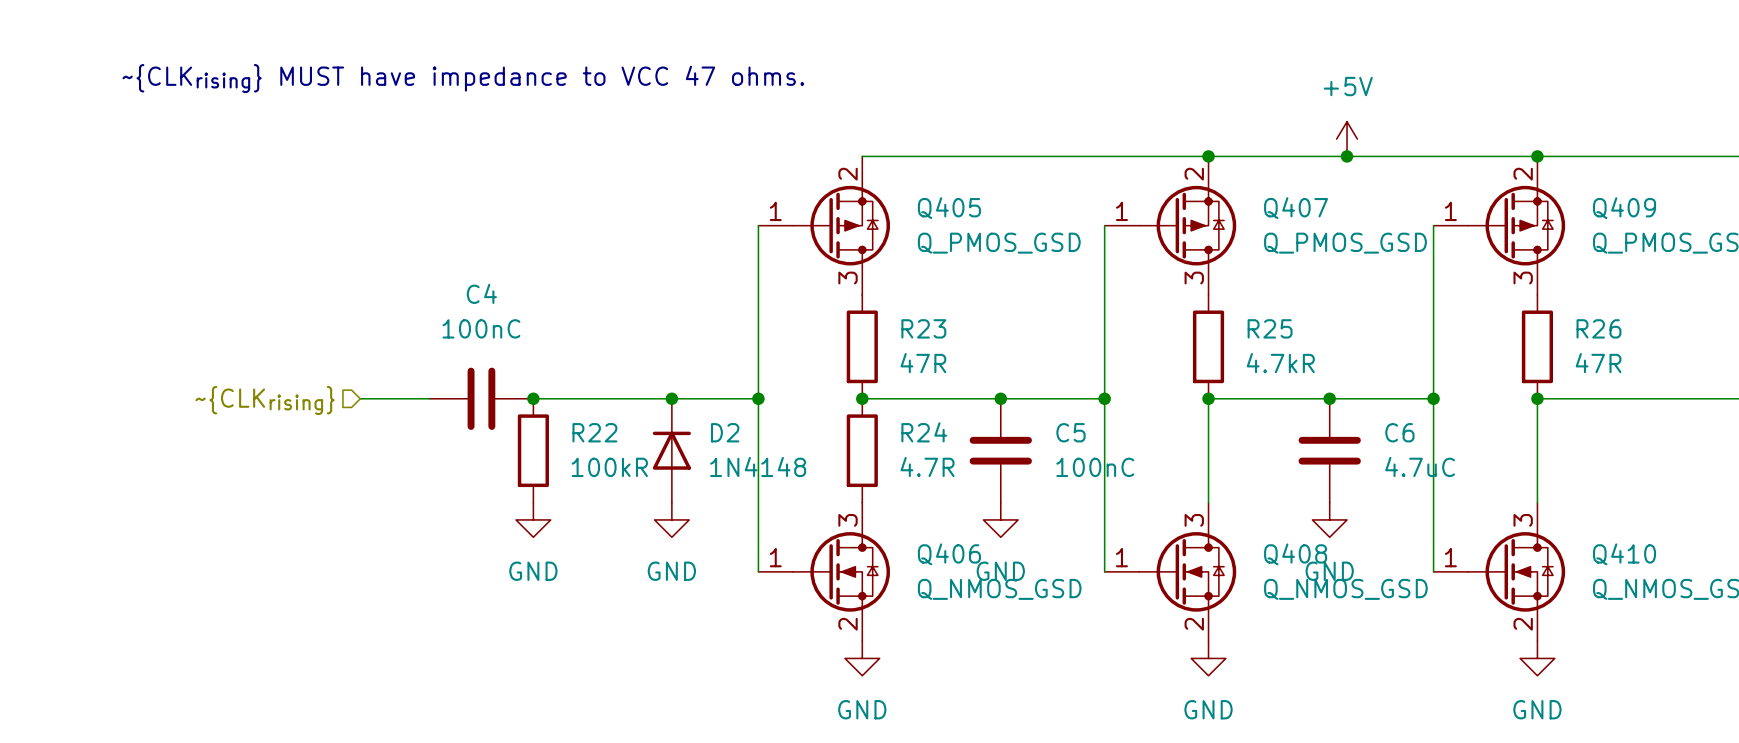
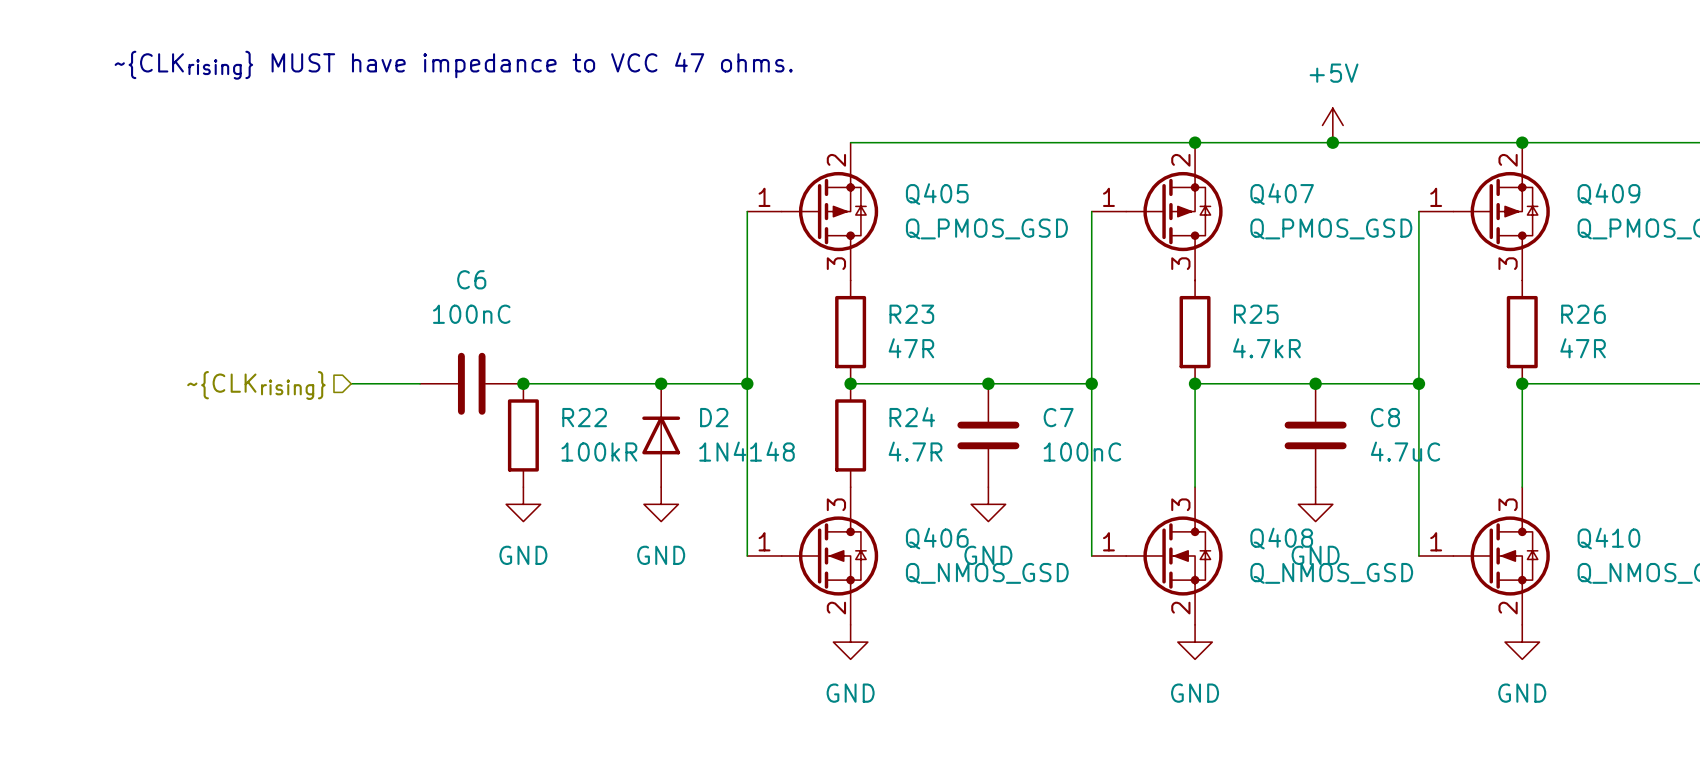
C4 name: C4 (481, 293) -> C6 (471, 279)
C5 name: C5 (1070, 432) -> C7 (1058, 417)
C6 name: C6 (1399, 432) -> C8 (1385, 417)

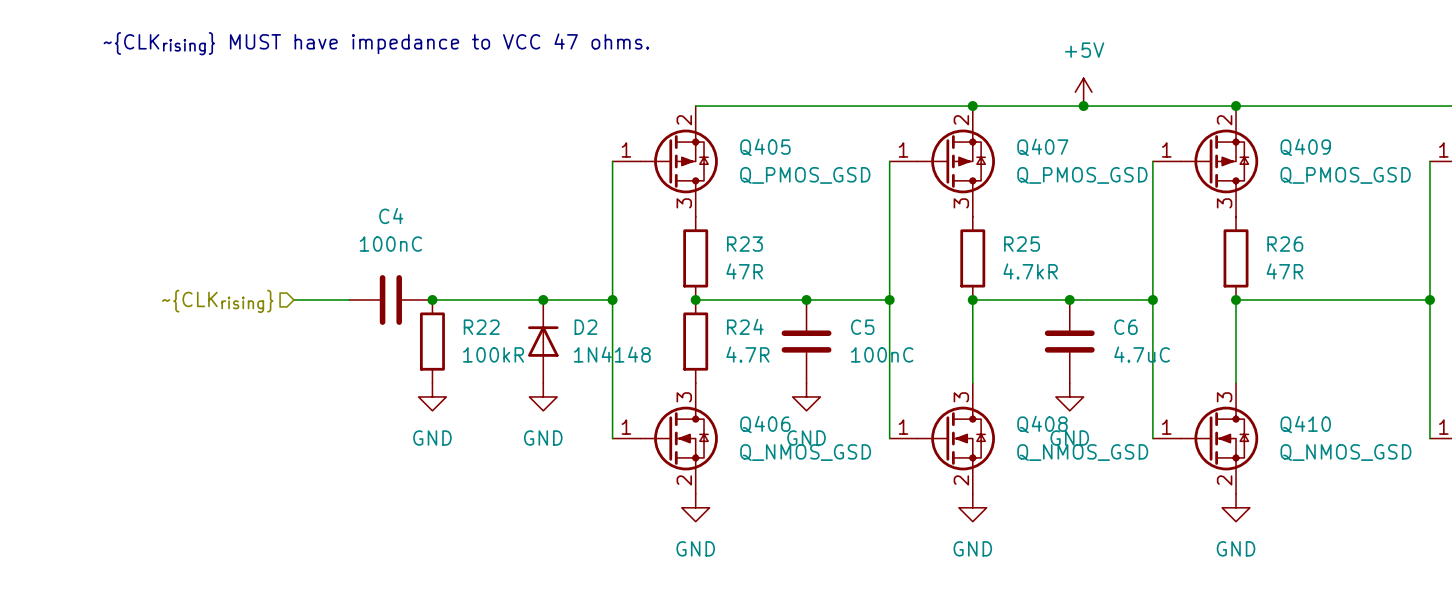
C6 name: C6 (471, 279) -> C4 (391, 216)
C7 name: C7 (1058, 417) -> C5 (862, 327)
C8 name: C8 (1385, 417) -> C6 (1125, 327)

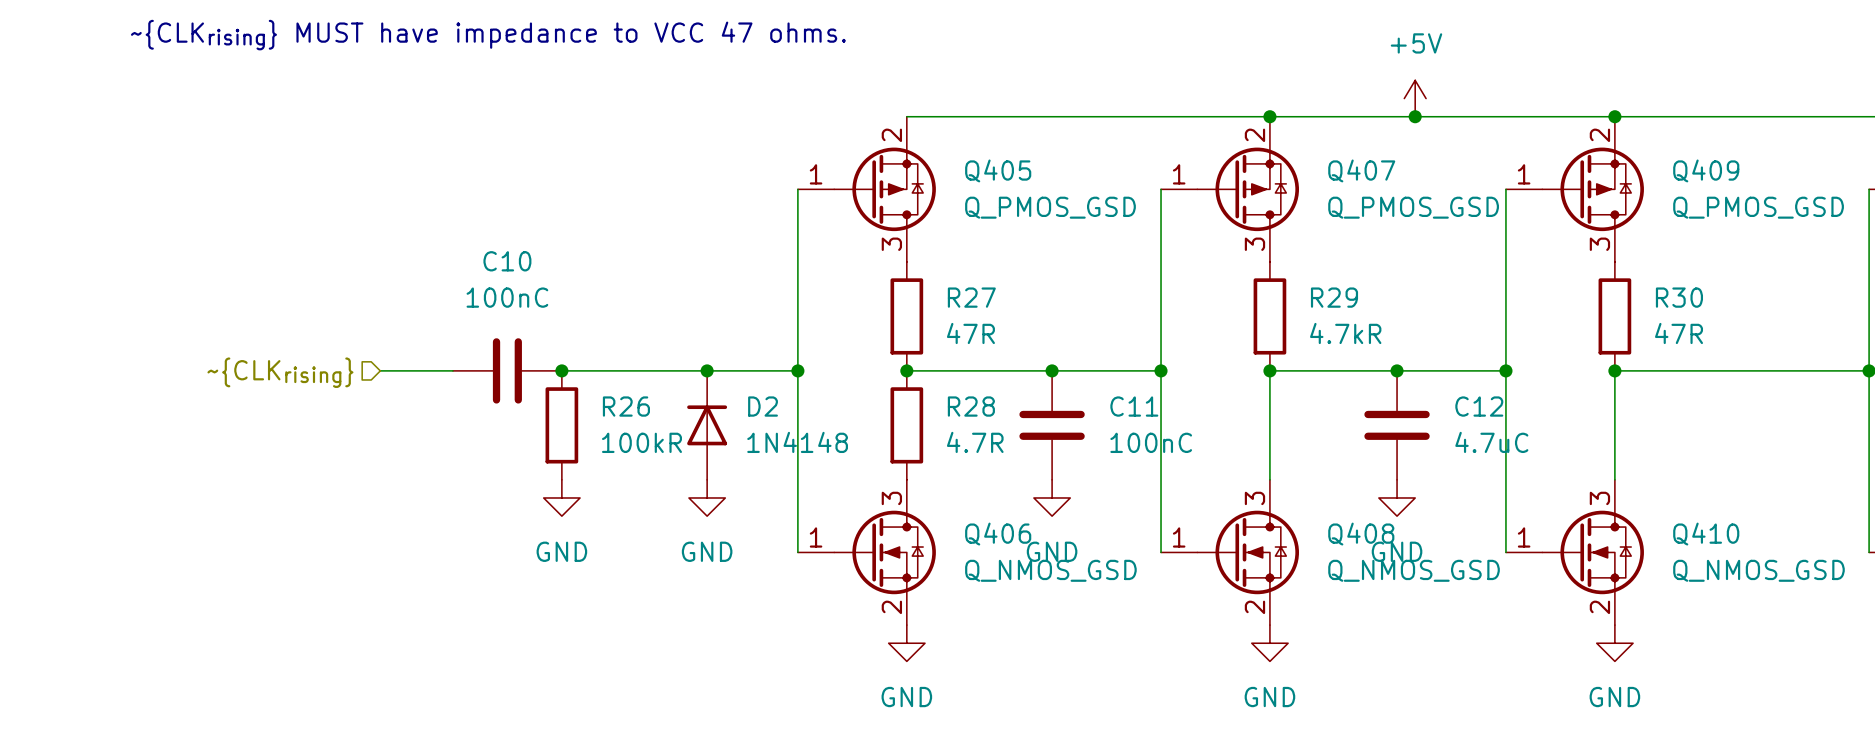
C4 name: C4 (391, 216) -> C10 (507, 261)
R23 name: R23 (744, 244) -> R27 (971, 297)
R25 name: R25 (1022, 244) -> R29 (1334, 297)
R26 name: R26 (1285, 244) -> R30 (1679, 297)
R24 name: R24 (745, 326) -> R28 (971, 406)
R22 name: R22 (481, 327) -> R26 (626, 406)
C5 name: C5 (862, 327) -> C11 (1134, 406)
C6 name: C6 (1125, 327) -> C12 (1479, 406)

